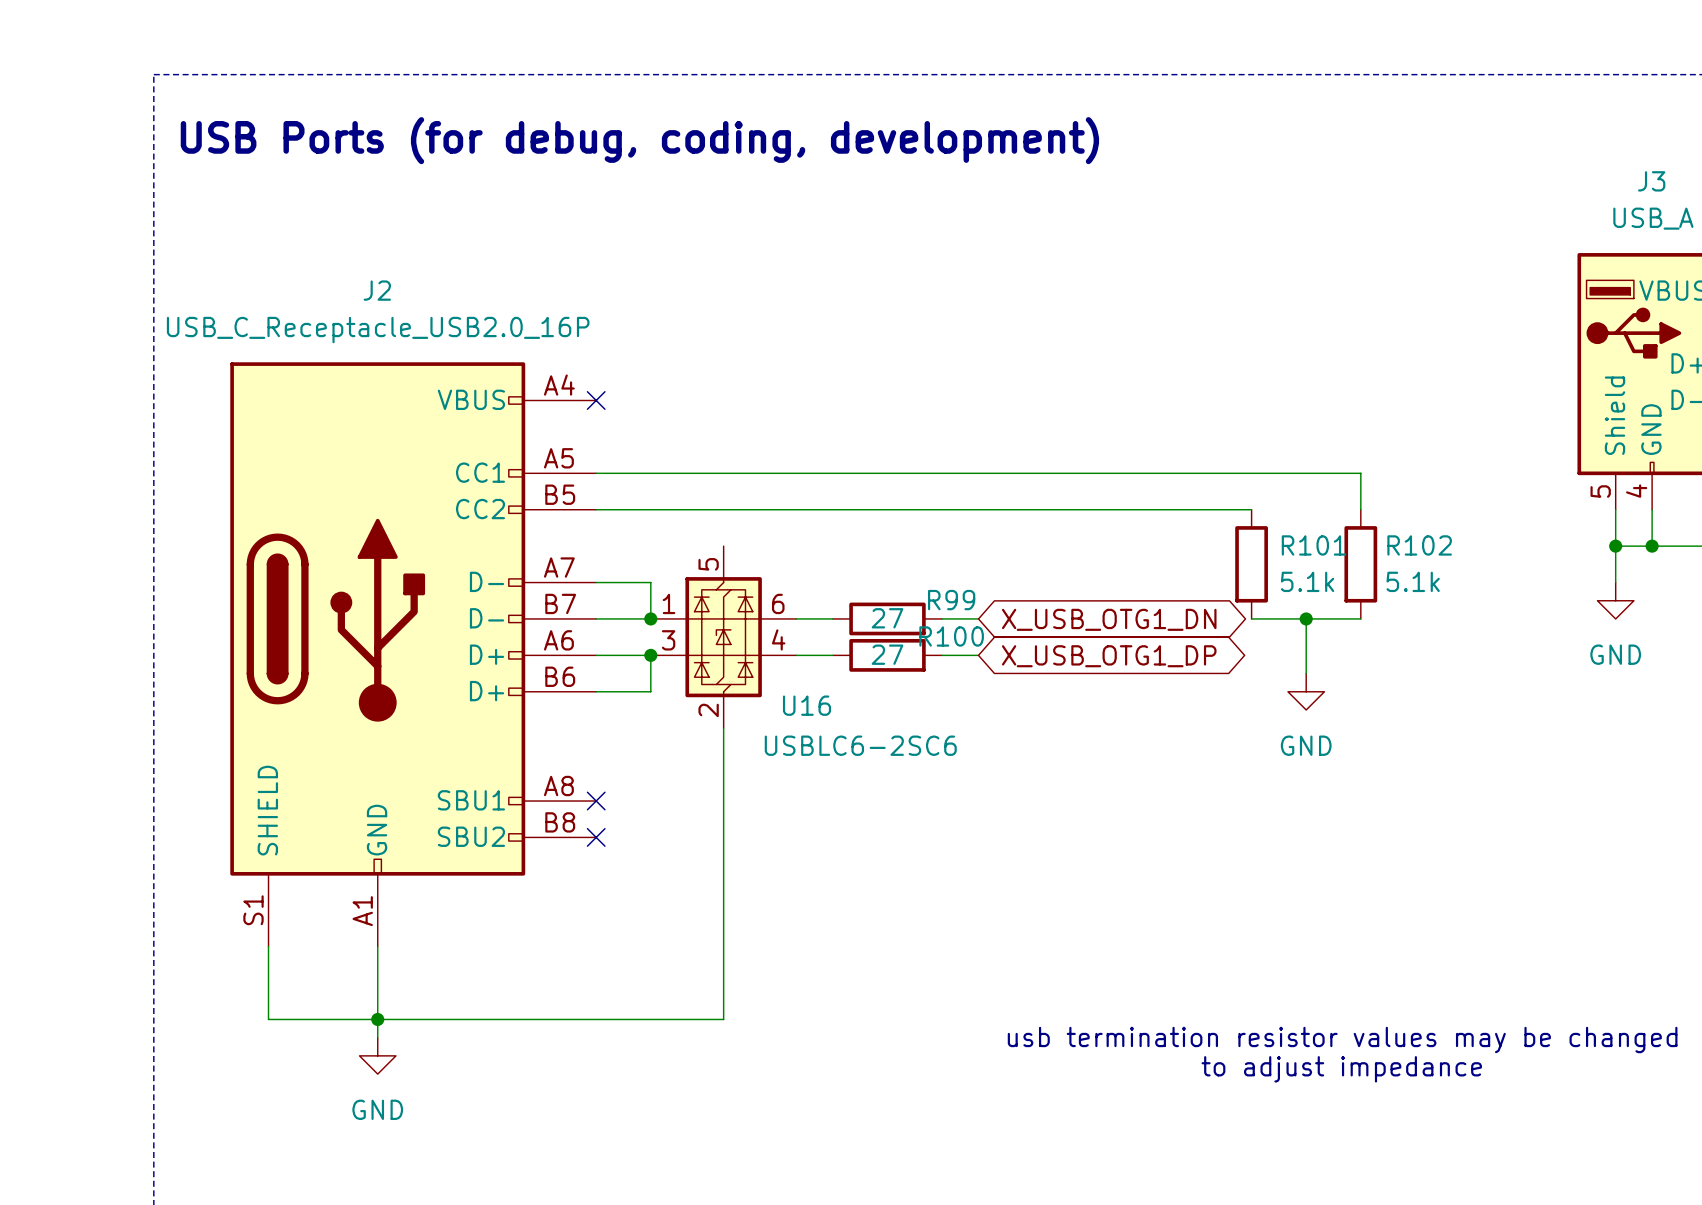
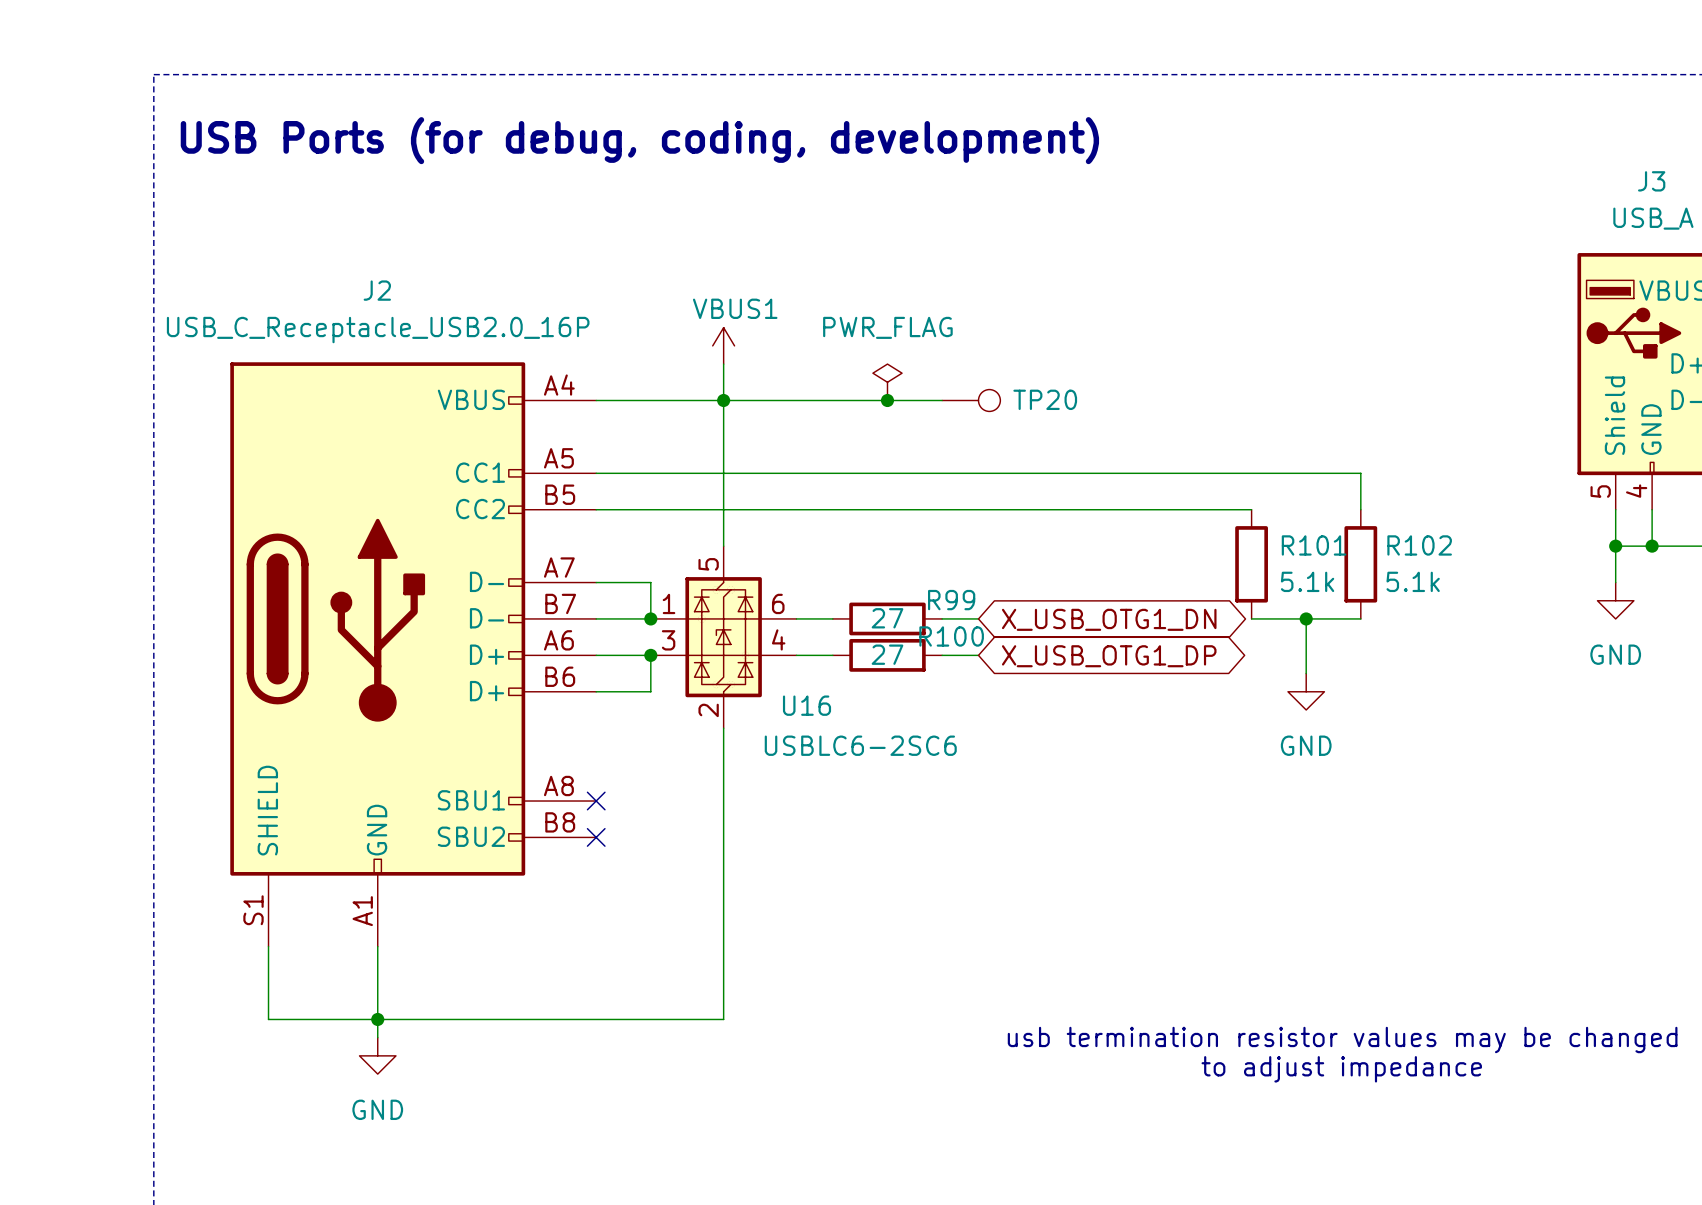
power symbol: none -> VBUS1 (723, 345)
wire: none -> (723, 364) (723, 546)
power symbol: none -> PWR_FLAG (887, 382)
wire: none -> (596, 400) (942, 400)
no-connect mark: (596, 400) -> none
junction: none -> (723, 400)
junction: none -> (887, 400)
TP20: none -> (971, 400)

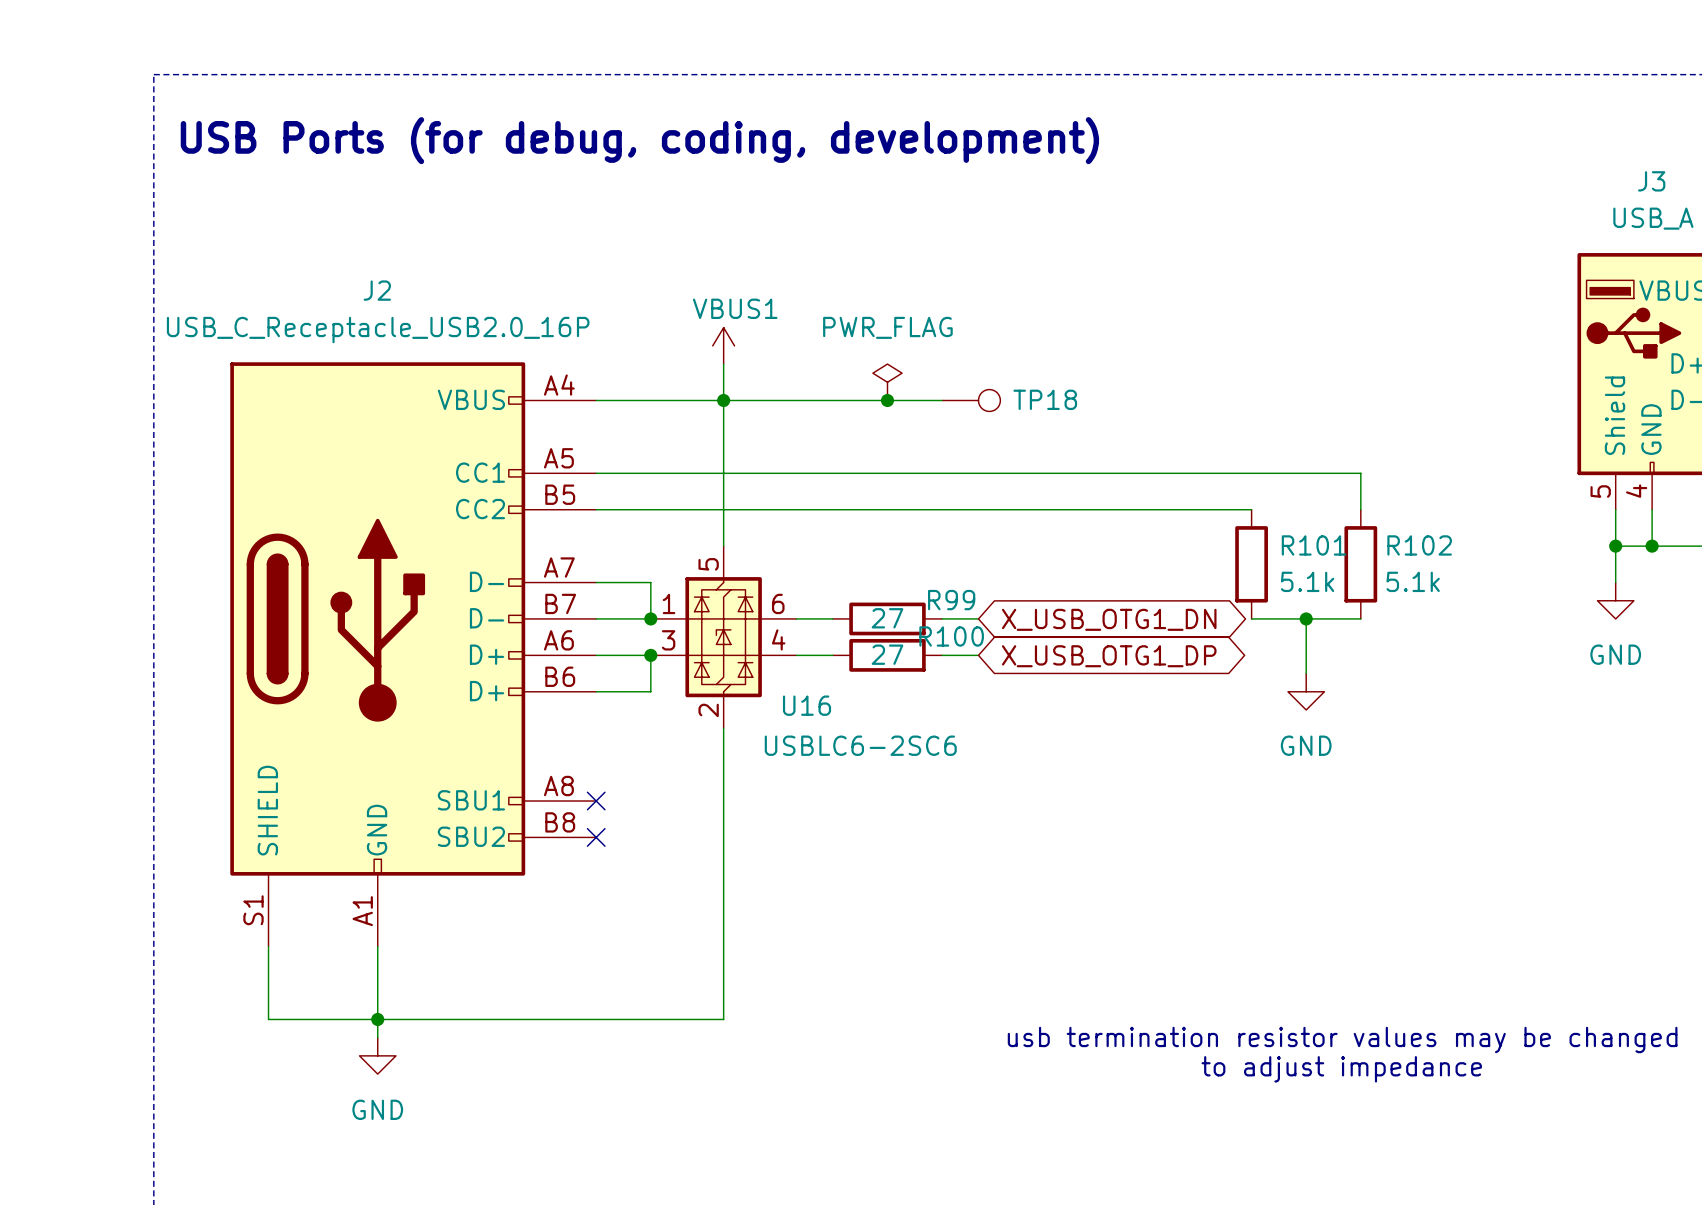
TP20 name: TP20 (1045, 399) -> TP18 (1045, 399)

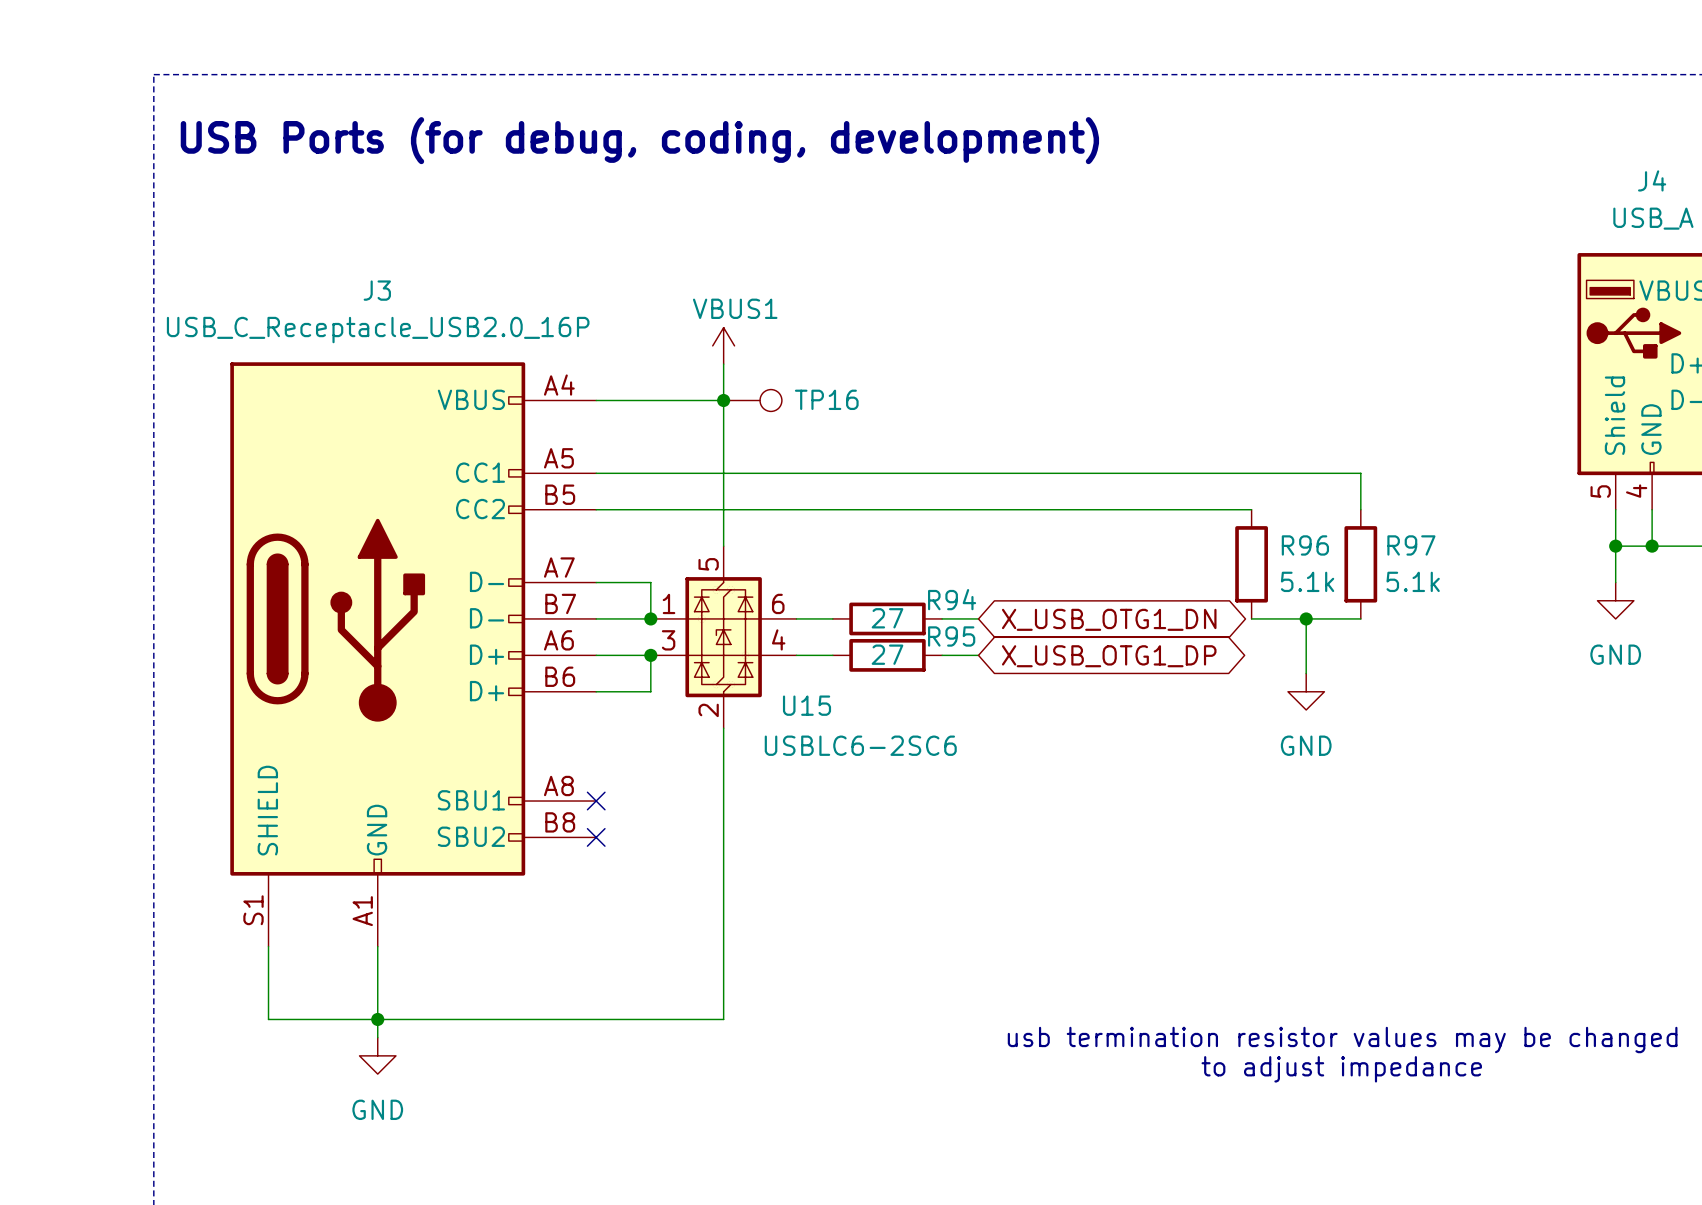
J3 name: J3 (1651, 181) -> J4 (1652, 180)
J2 name: J2 (377, 290) -> J3 (377, 290)
power symbol: PWR_FLAG (887, 382) -> none
wire: (723, 400) (942, 400) -> none
TP16: none -> (752, 400)
junction: (887, 400) -> none
TP18: (971, 400) -> none
R101 name: R101 (1314, 545) -> R96 (1305, 545)
R102 name: R102 (1419, 545) -> R97 (1411, 545)
R99 name: R99 (951, 600) -> R94 (952, 599)
R100 name: R100 (951, 636) -> R95 (951, 636)
U16 name: U16 (807, 705) -> U15 (807, 705)

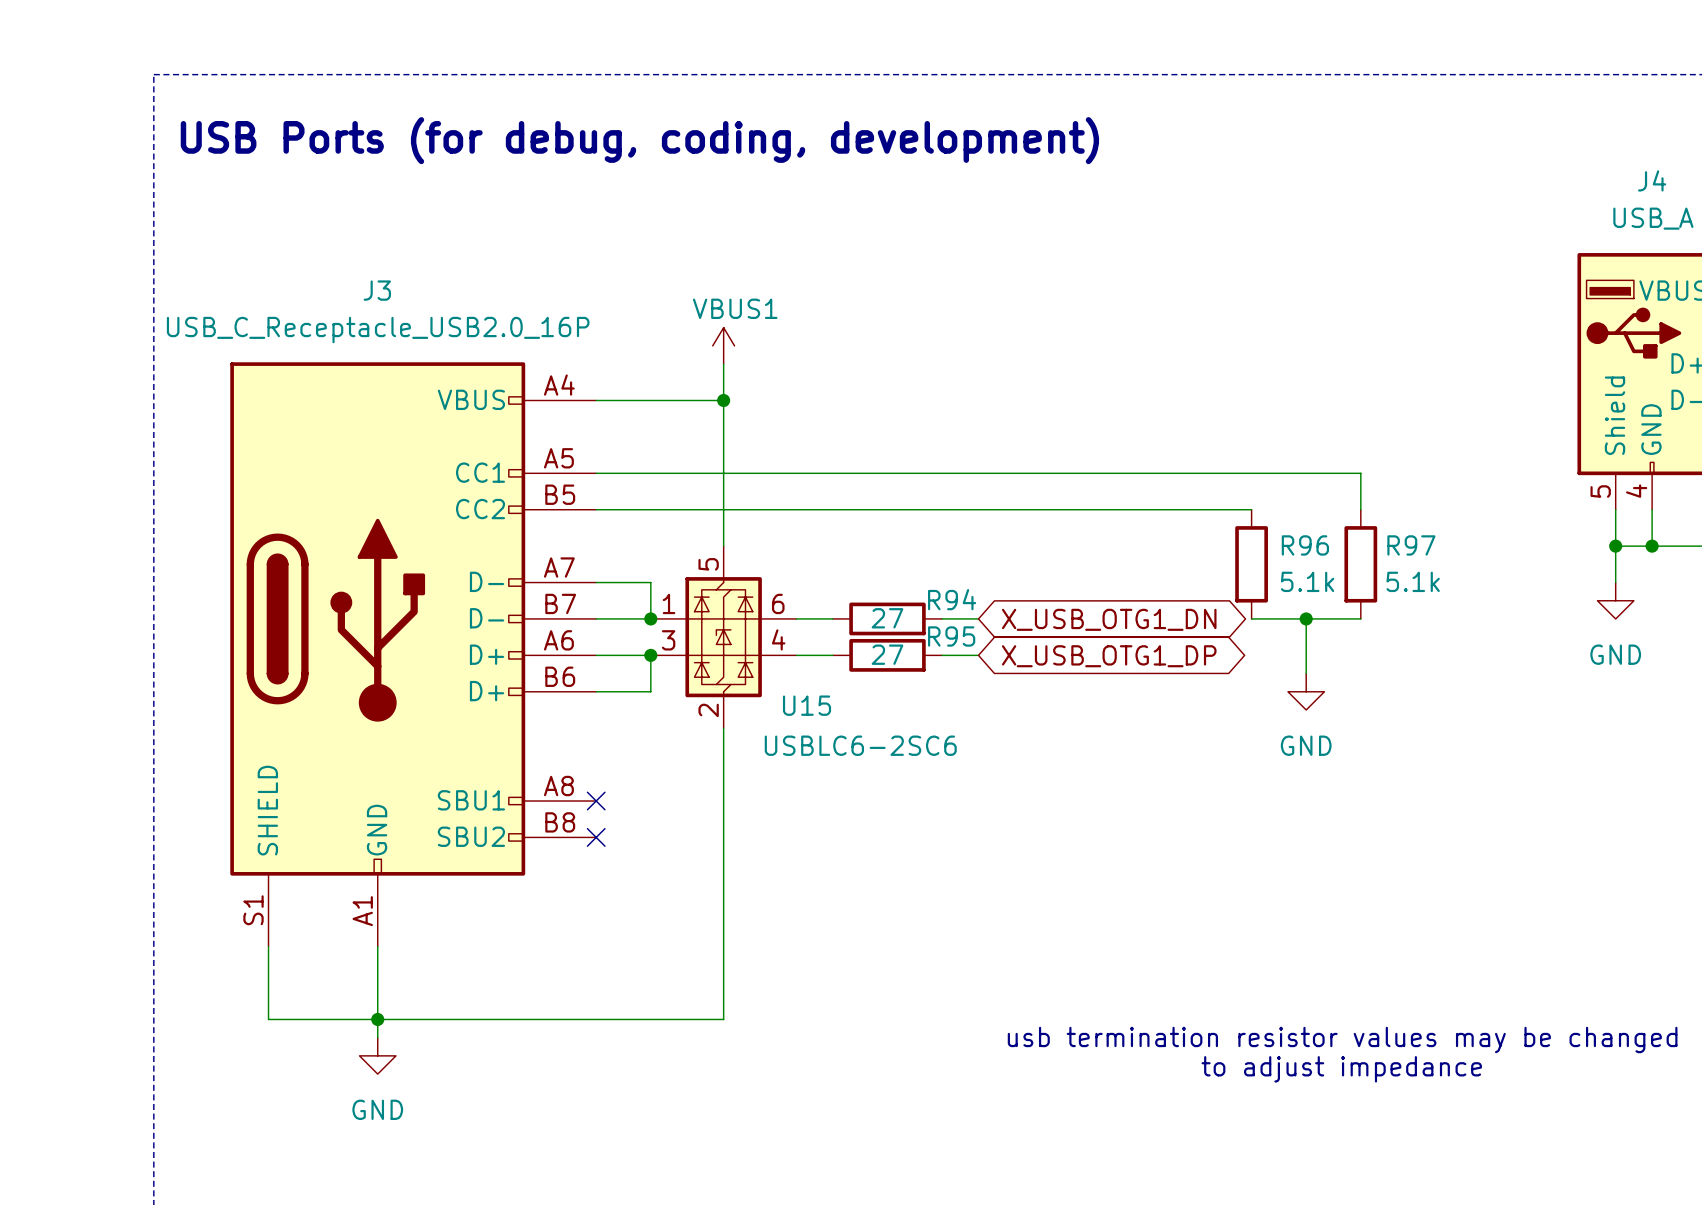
TP16: (752, 400) -> none

